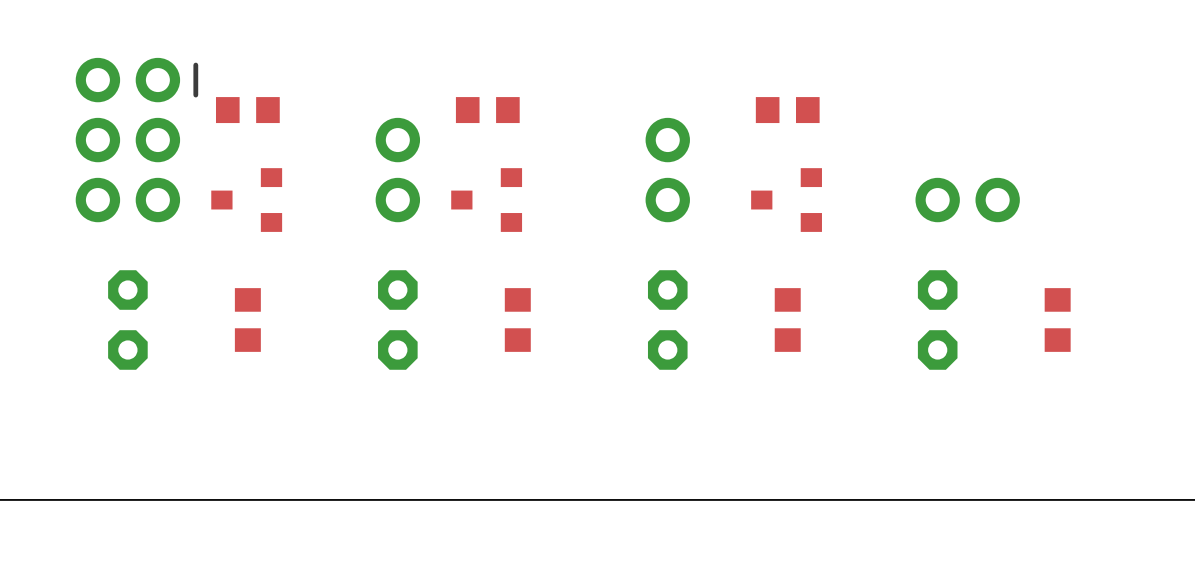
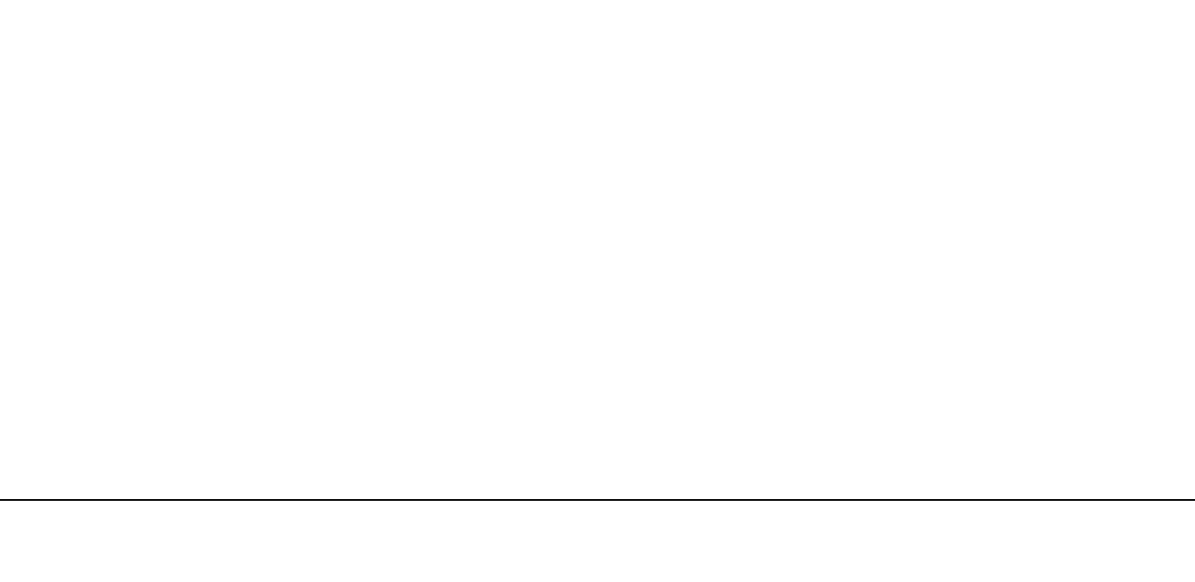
part: (247, 110) -> none
part: (487, 110) -> none
part: (787, 110) -> none
part: (136, 140) -> none
part: (397, 170) -> none
part: (667, 170) -> none
part: (246, 200) -> none
part: (486, 200) -> none
part: (786, 200) -> none
part: (967, 200) -> none
part: (127, 320) -> none
part: (247, 320) -> none
part: (397, 320) -> none
part: (517, 320) -> none
part: (667, 320) -> none
part: (787, 320) -> none
part: (937, 320) -> none
part: (1057, 320) -> none

